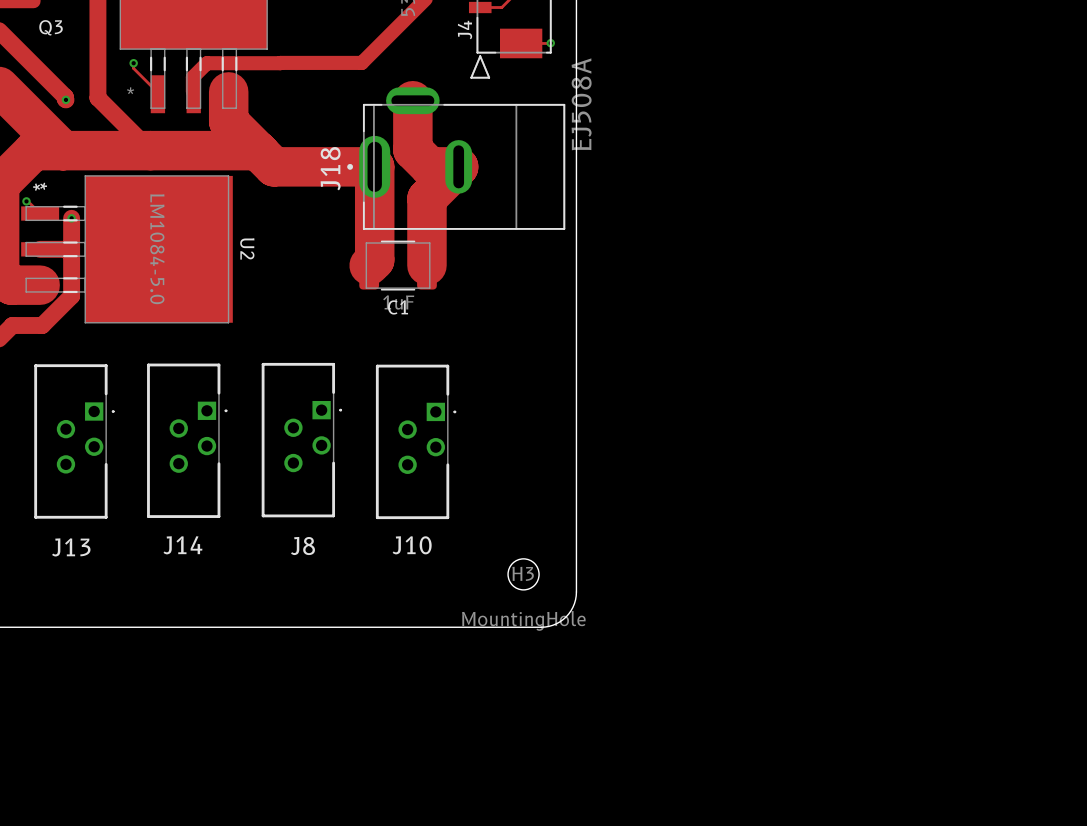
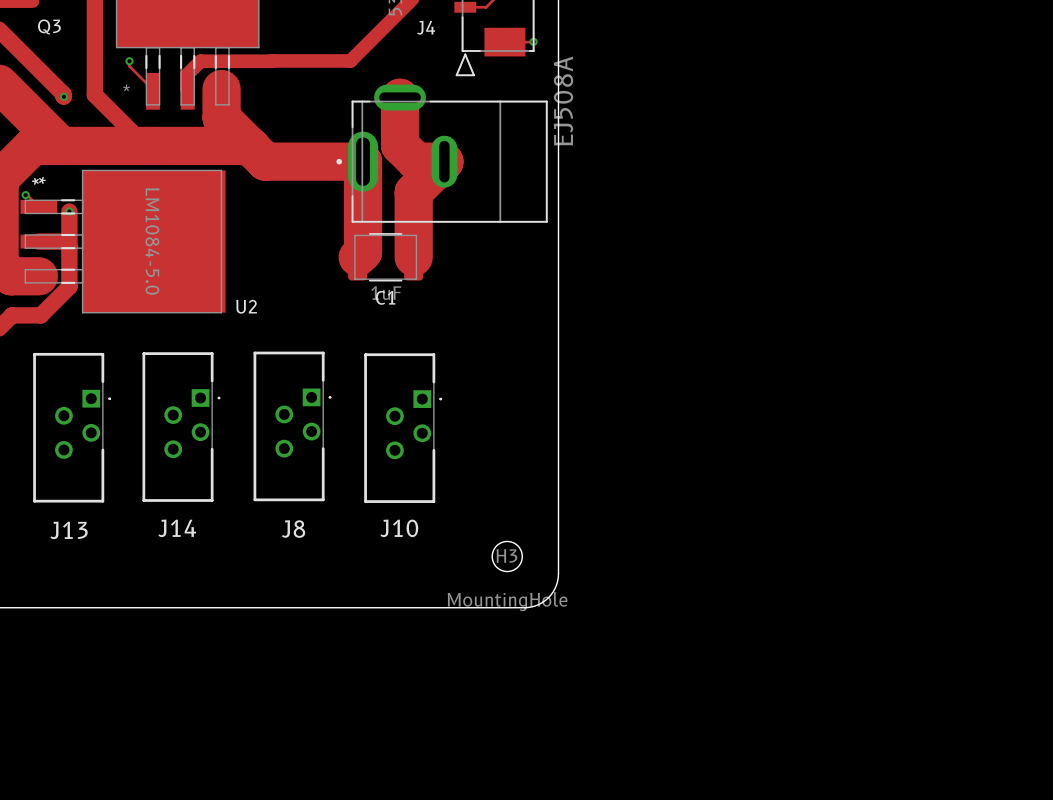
J4 name rotation: 0° (465, 30) -> 90° clockwise (426, 27)
J18 name: J18 (330, 168) -> none
U2 name rotation: 0° (247, 248) -> 90° counterclockwise (246, 306)
U2 name position: U2 (247, 248) -> U2 (246, 306)

